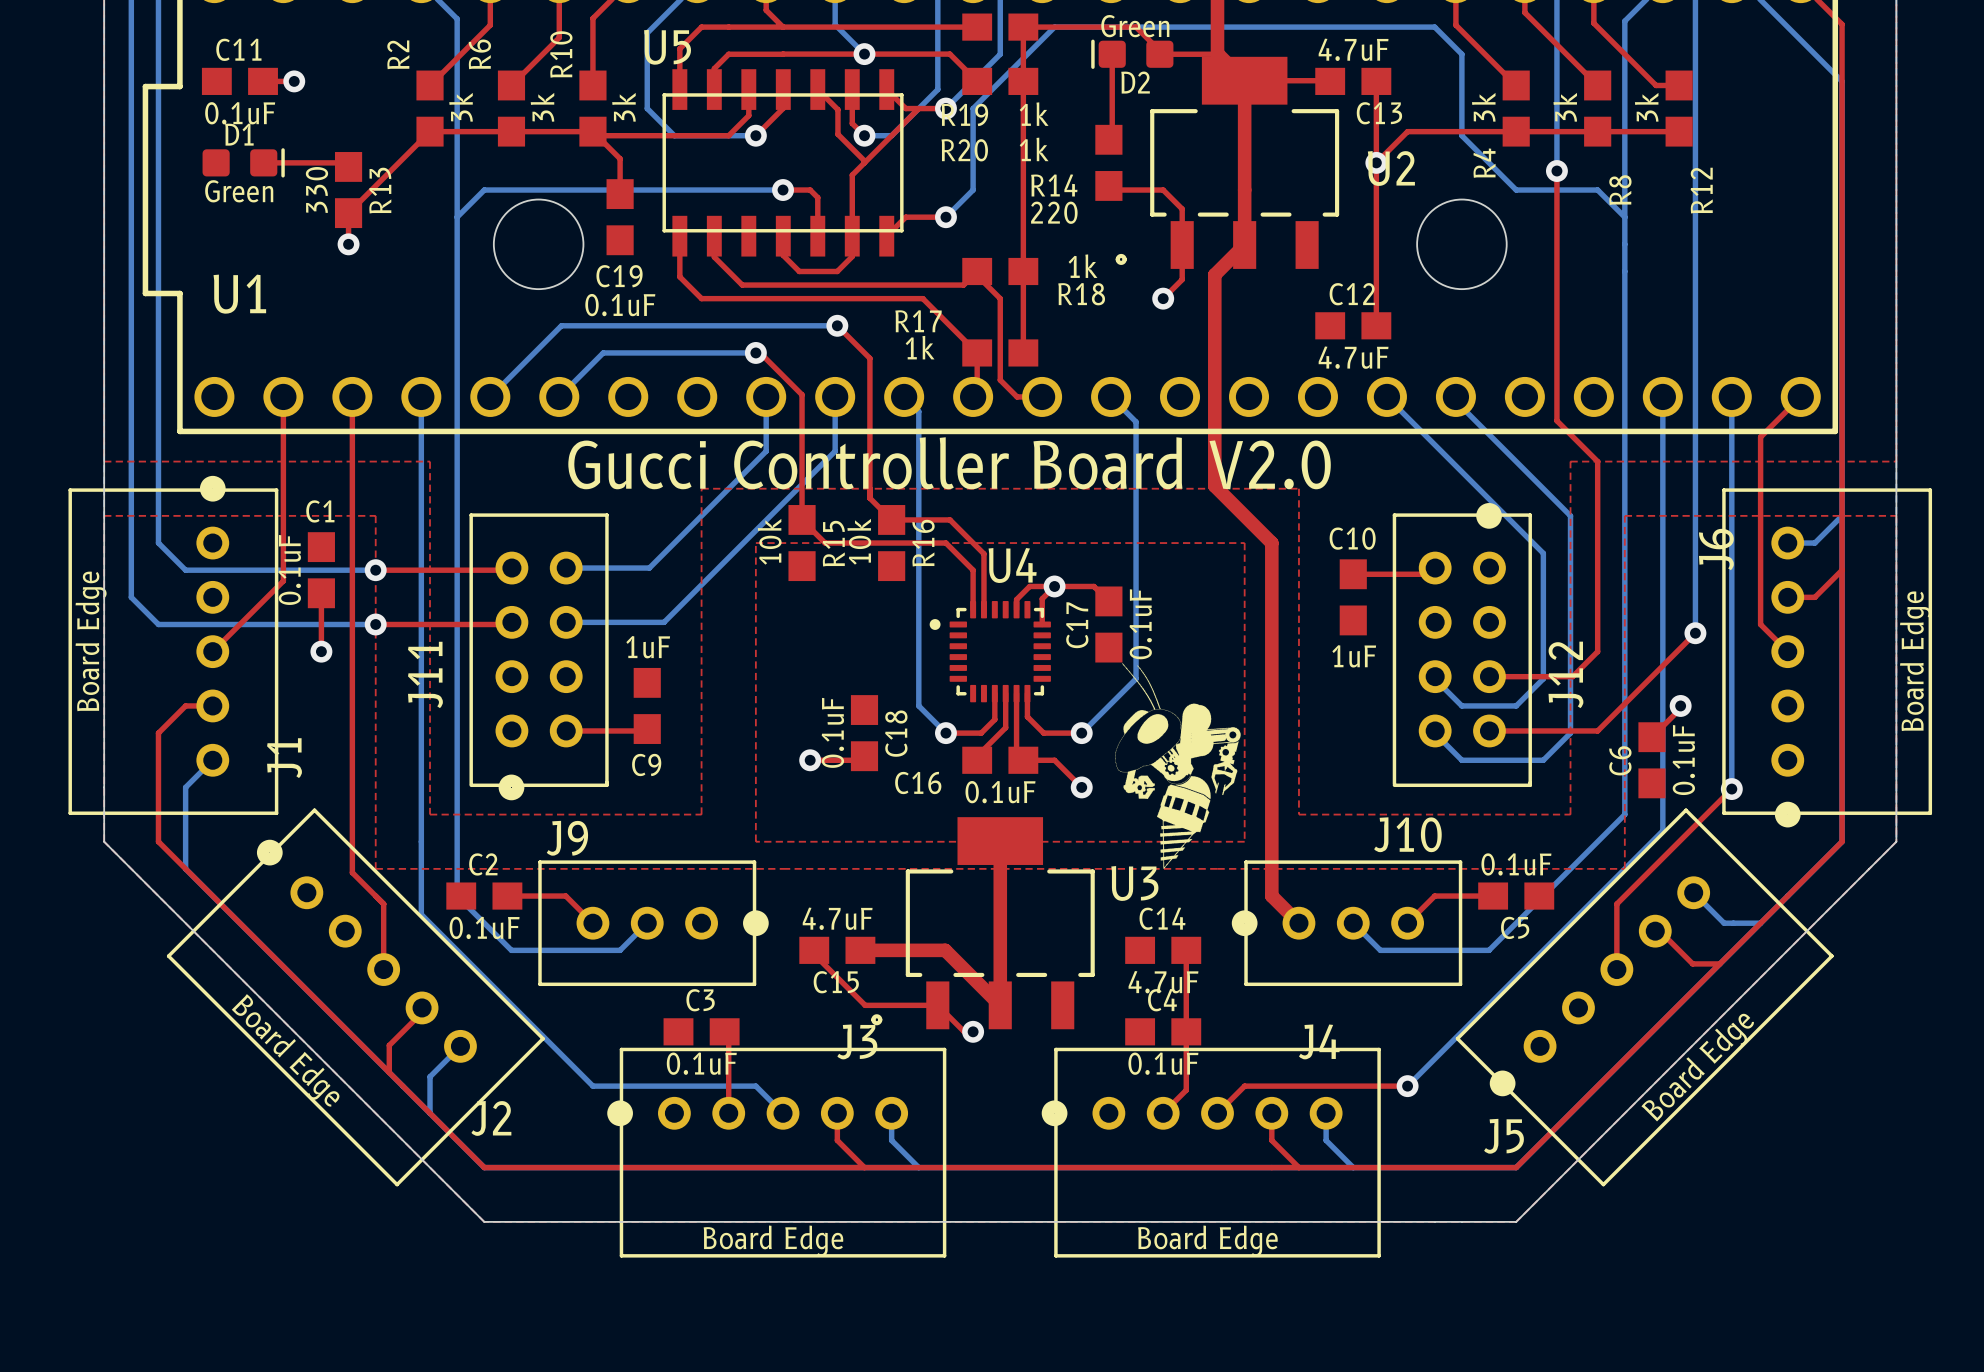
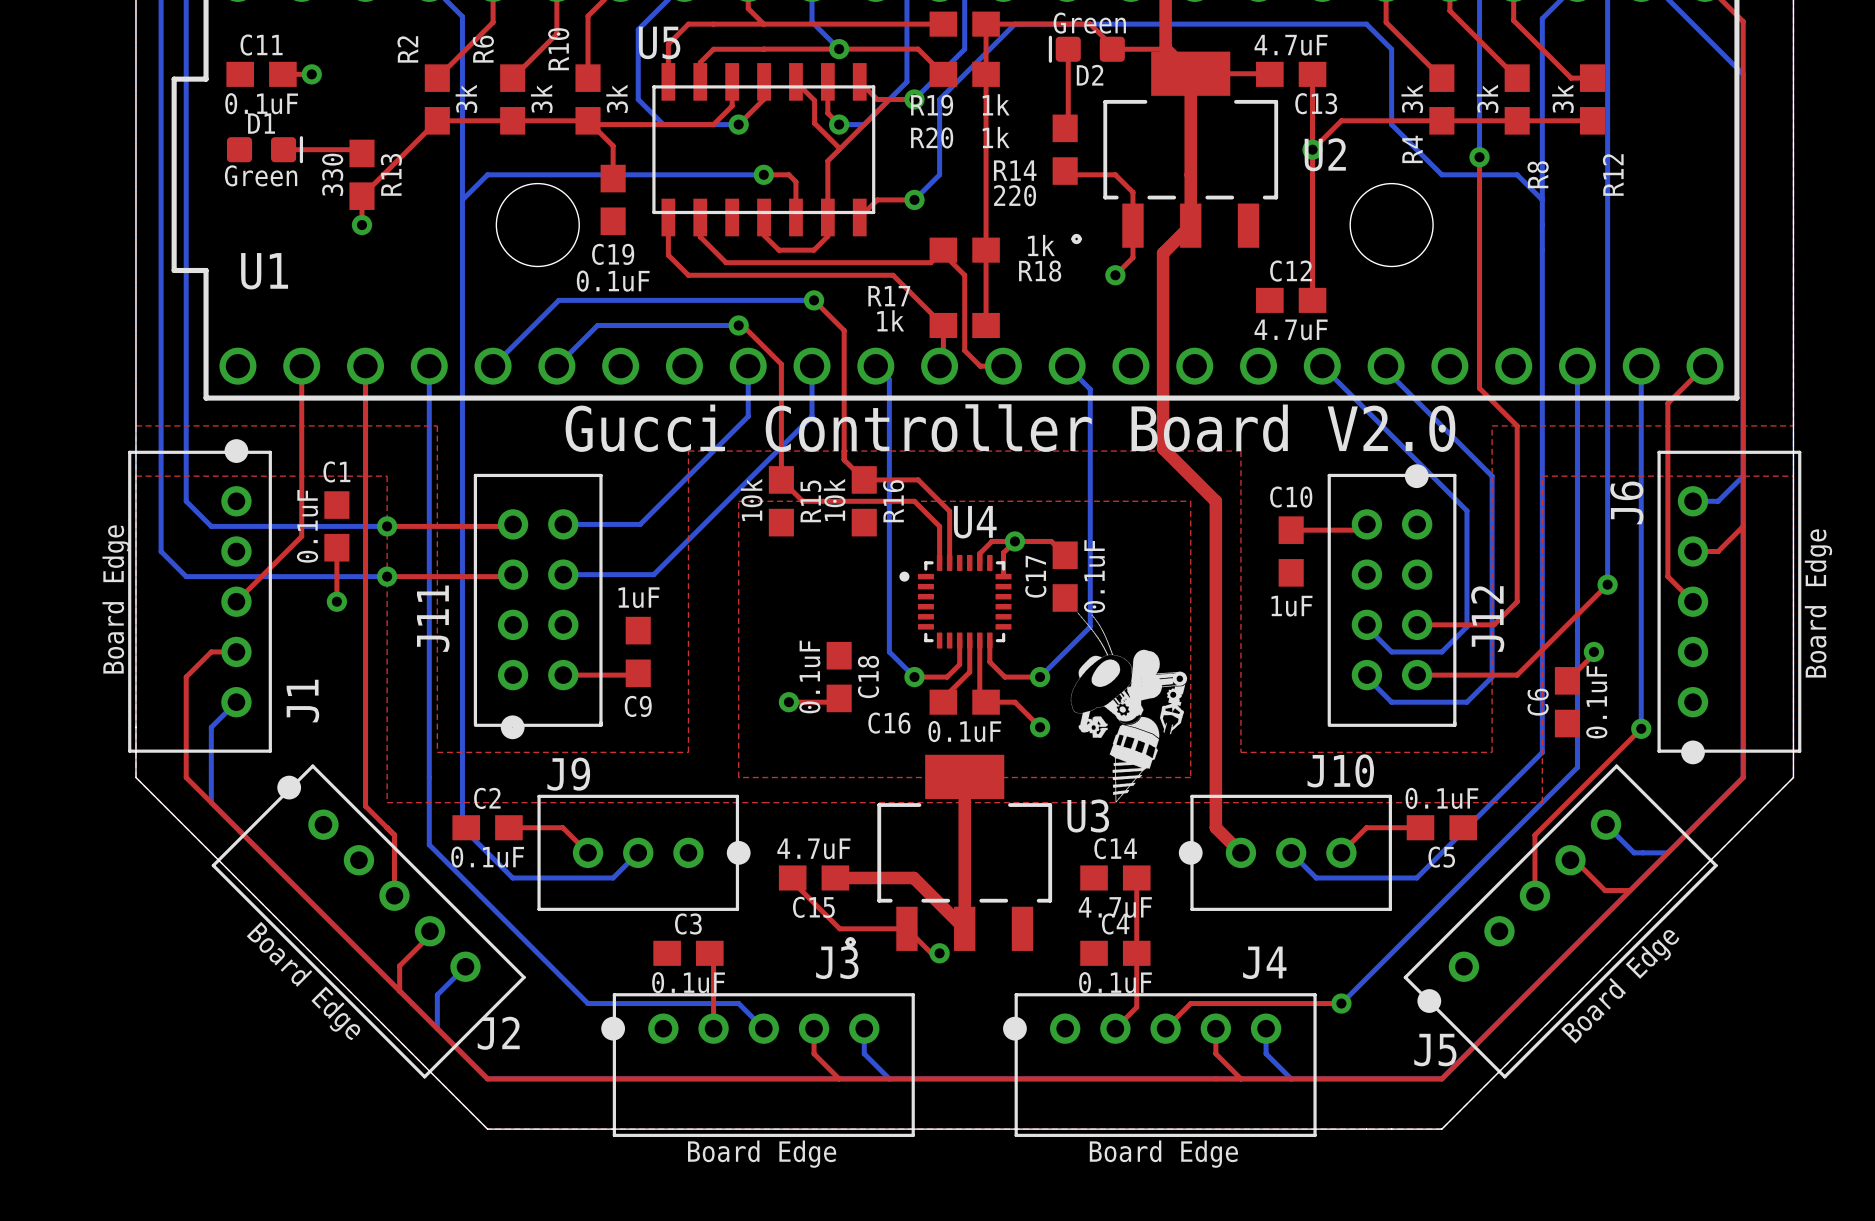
J1 footprint: [68, 488, 279, 815] -> [128, 450, 272, 753]
J6 footprint: [1722, 488, 1933, 815] -> [1657, 450, 1802, 753]
J2 footprint: [166, 808, 545, 1187] -> [211, 764, 526, 1079]
J5 footprint: [1455, 808, 1834, 1187] -> [1403, 764, 1718, 1079]
J3 footprint: [619, 1047, 947, 1258] -> [612, 993, 915, 1137]
J4 footprint: [1054, 1047, 1381, 1258] -> [1014, 993, 1317, 1137]

